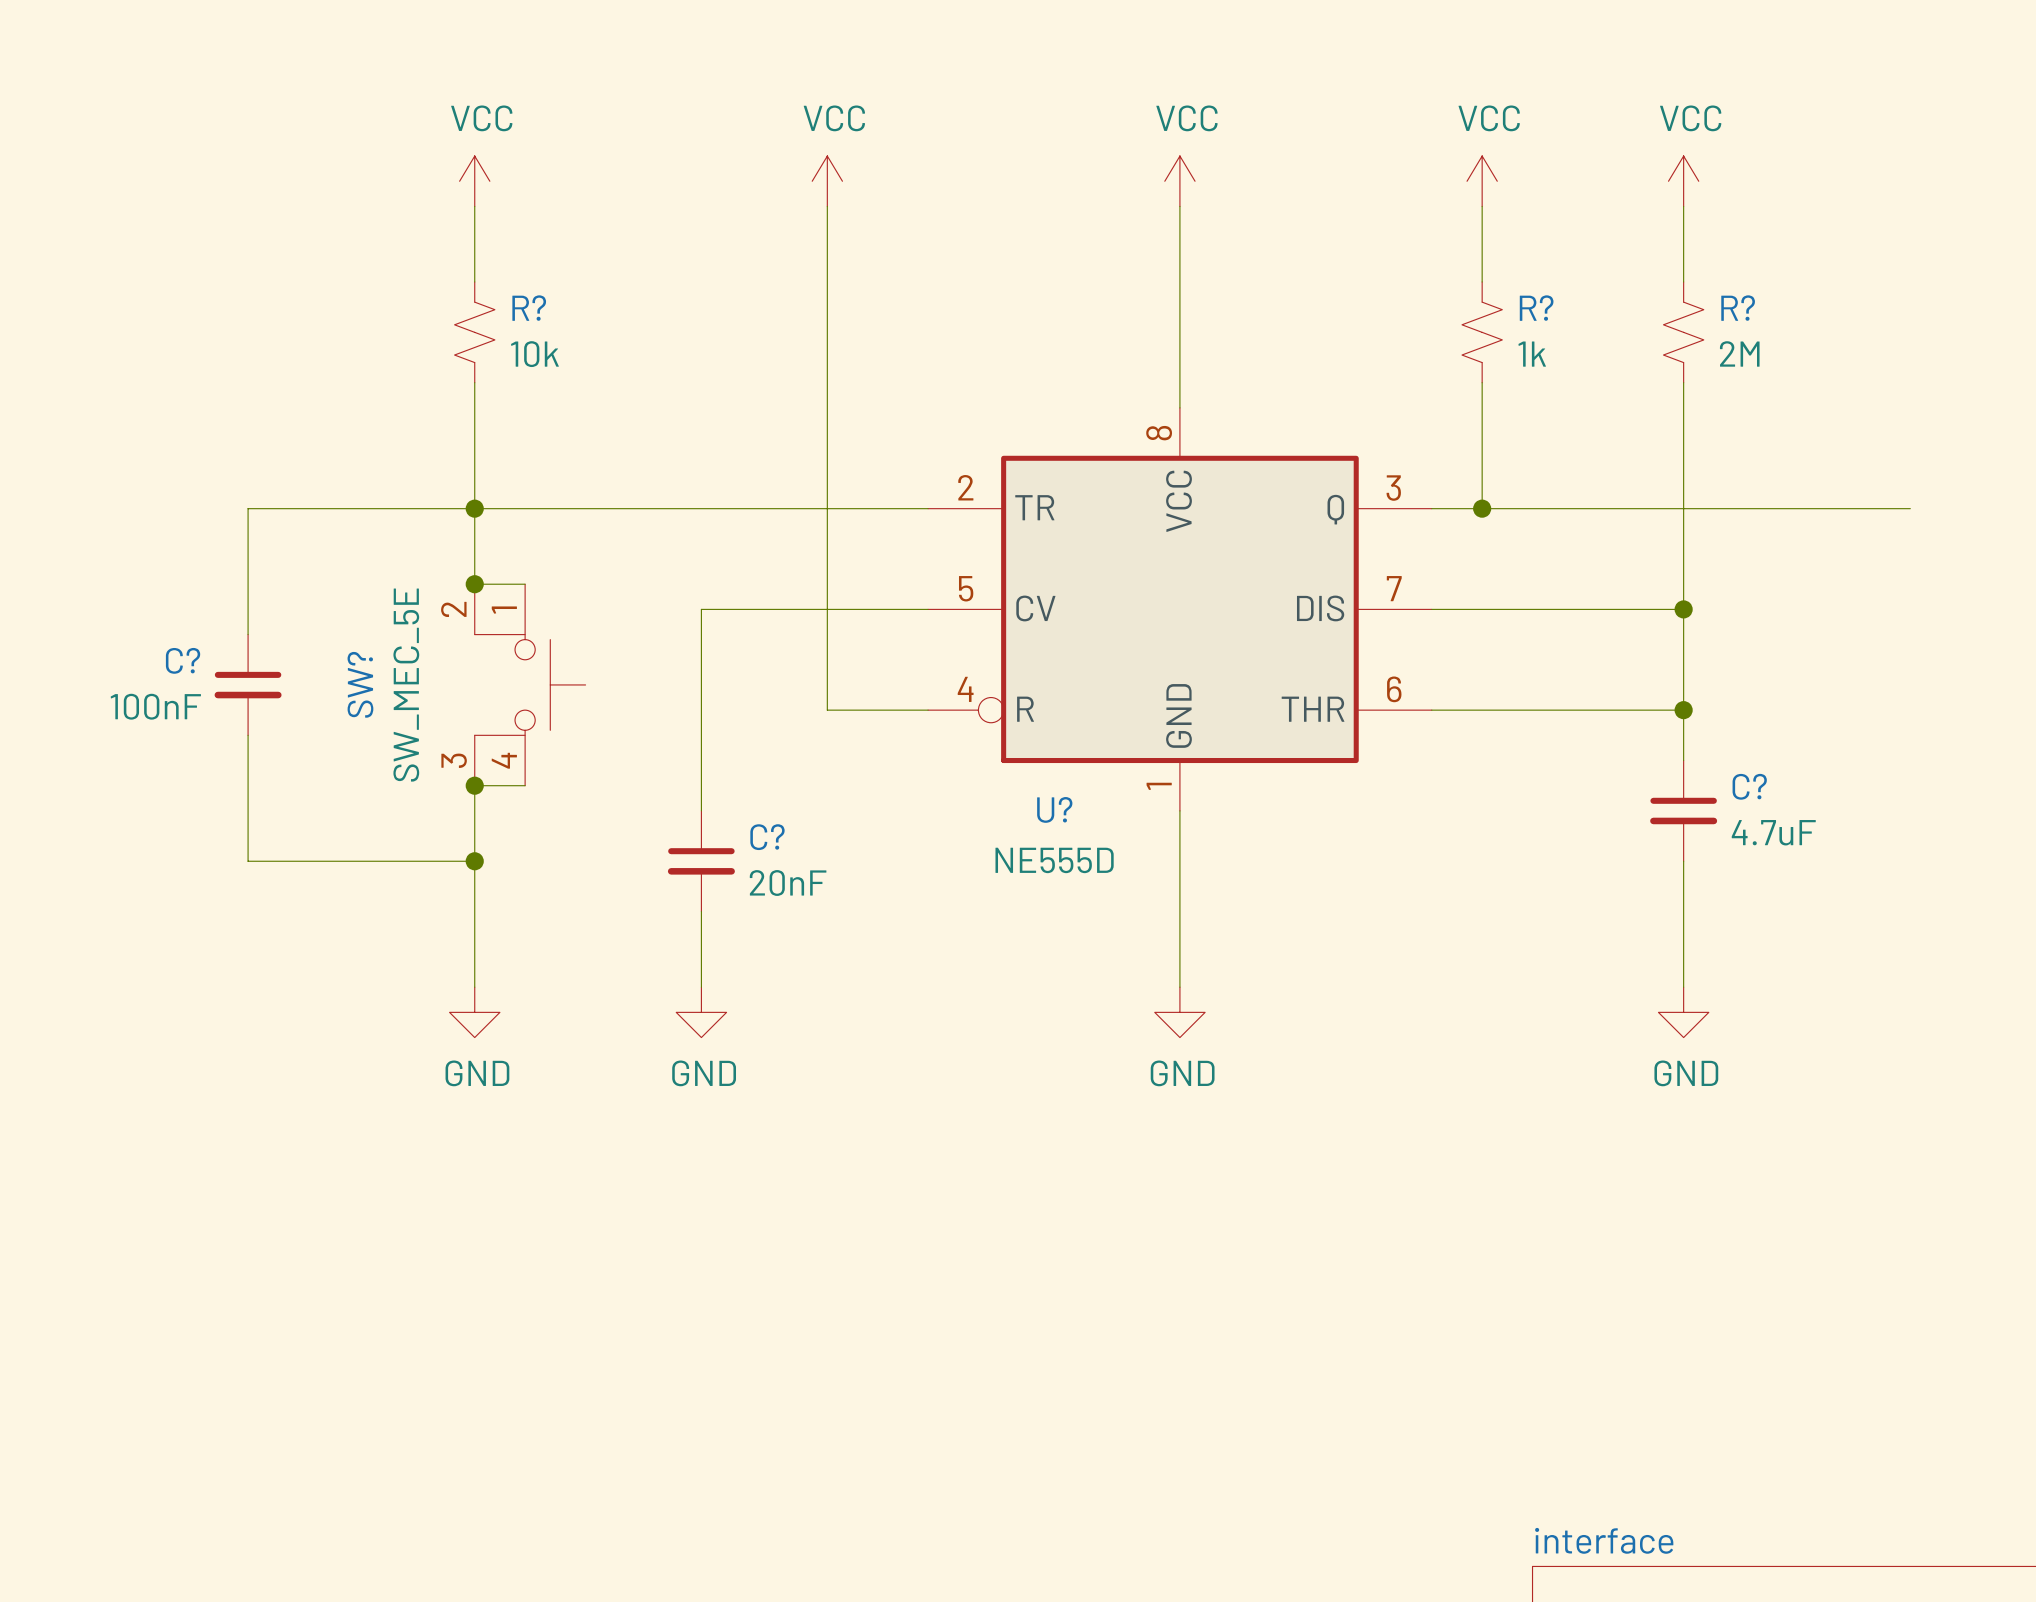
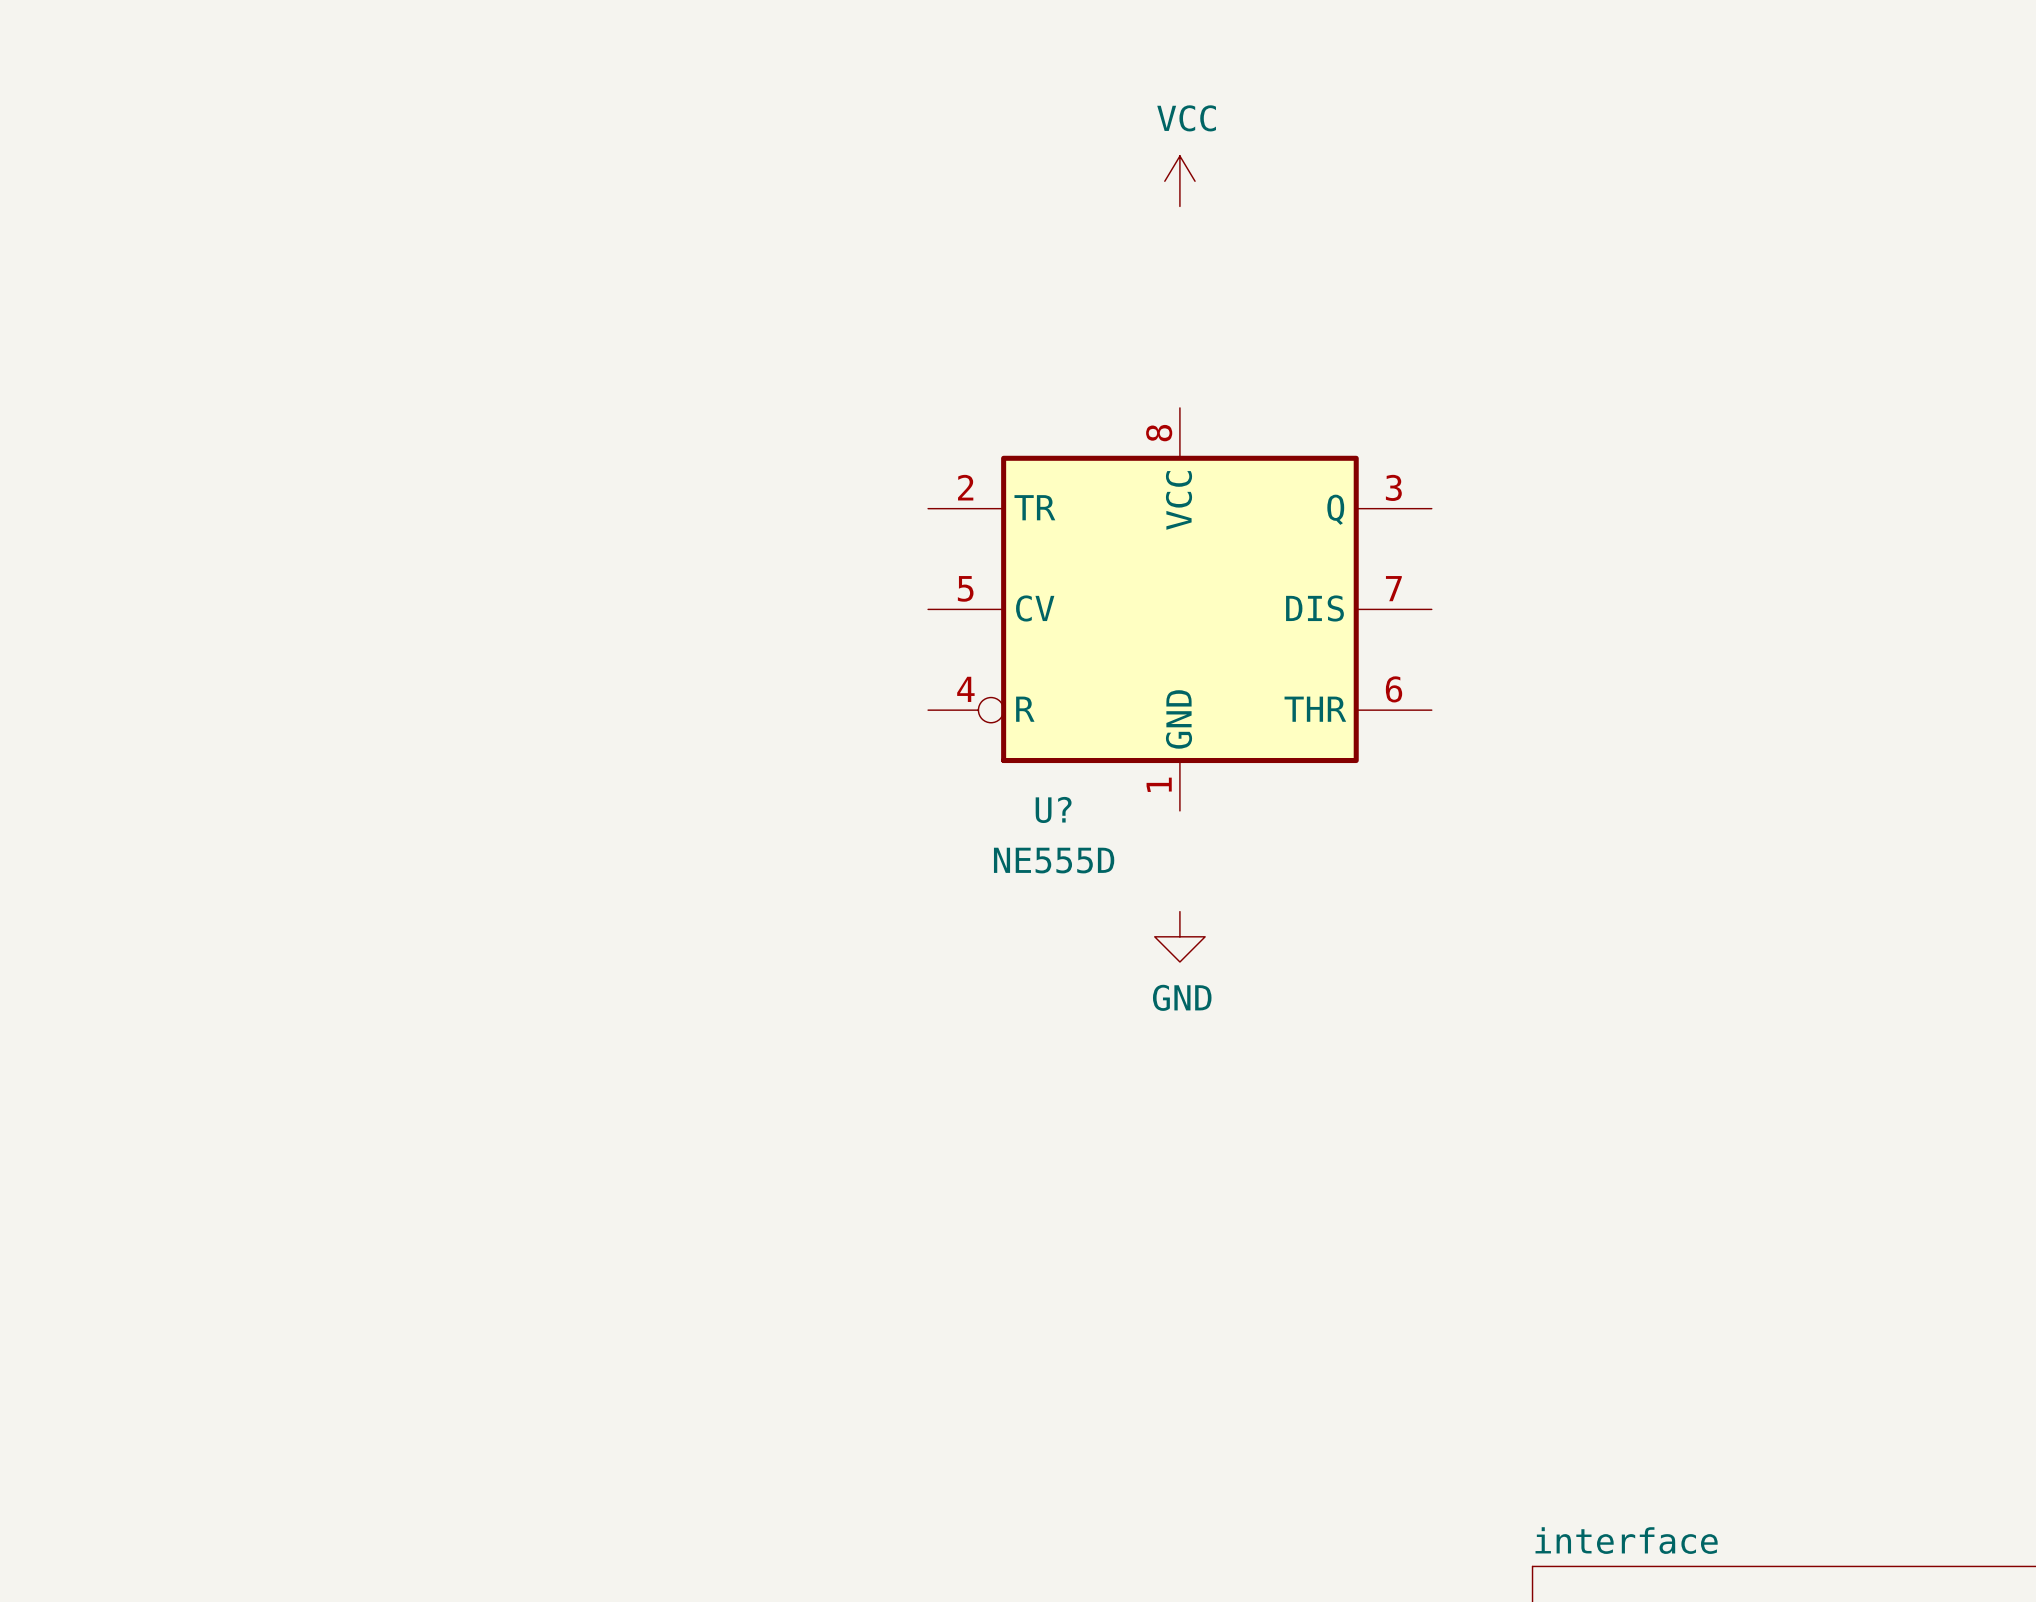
power symbol: VCC (474, 181) -> none
power symbol: VCC (827, 181) -> none
power symbol: VCC (1482, 181) -> none
power symbol: VCC (1683, 181) -> none
wire: (474, 206) (474, 281) -> none
wire: (827, 206) (827, 710) (928, 710) -> none
wire: (1179, 206) (1179, 407) -> none
wire: (1482, 206) (1482, 281) -> none
wire: (1683, 206) (1683, 281) -> none
R?: 10k (474, 332) -> none
R?: 1k (1482, 332) -> none
R?: 2M (1683, 332) -> none
wire: (474, 382) (474, 584) (525, 584) -> none
wire: (1482, 382) (1482, 508) -> none
wire: (1683, 382) (1683, 760) -> none
junction: (474, 508) -> none
wire: (928, 508) (248, 508) (248, 634) -> none
wire: (1431, 508) (1910, 508) -> none
junction: (1482, 508) -> none
junction: (474, 584) -> none
wire: (928, 609) (701, 609) (701, 810) -> none
wire: (1431, 609) (1683, 609) -> none
junction: (1683, 609) -> none
C?: 100nF (248, 684) -> none
SW?: SW_MEC_5E (530, 684) -> none
wire: (1431, 710) (1683, 710) -> none
junction: (1683, 710) -> none
wire: (248, 735) (248, 861) (474, 861) -> none
junction: (474, 785) -> none
wire: (525, 785) (474, 785) (474, 987) -> none
wire: (1179, 810) (1179, 987) -> none
C?: 4.7uF (1683, 810) -> none
junction: (474, 861) -> none
C?: 20nF (701, 861) -> none
wire: (1683, 861) (1683, 987) -> none
wire: (701, 911) (701, 987) -> none
power symbol: GND (474, 1012) -> none
power symbol: GND (701, 1012) -> none
power symbol position: GND (1179, 1012) -> GND (1179, 936)
power symbol: GND (1683, 1012) -> none

